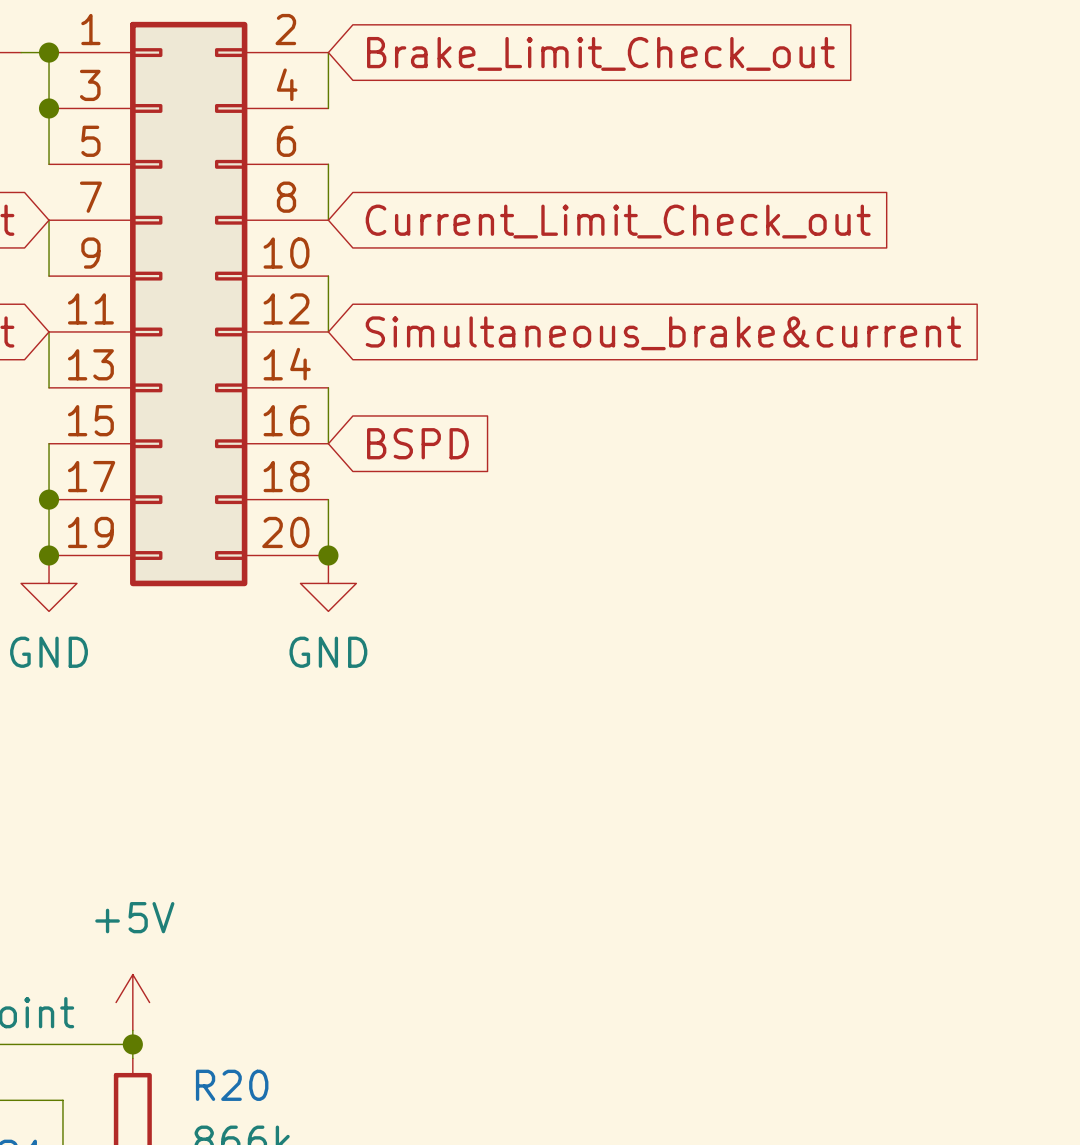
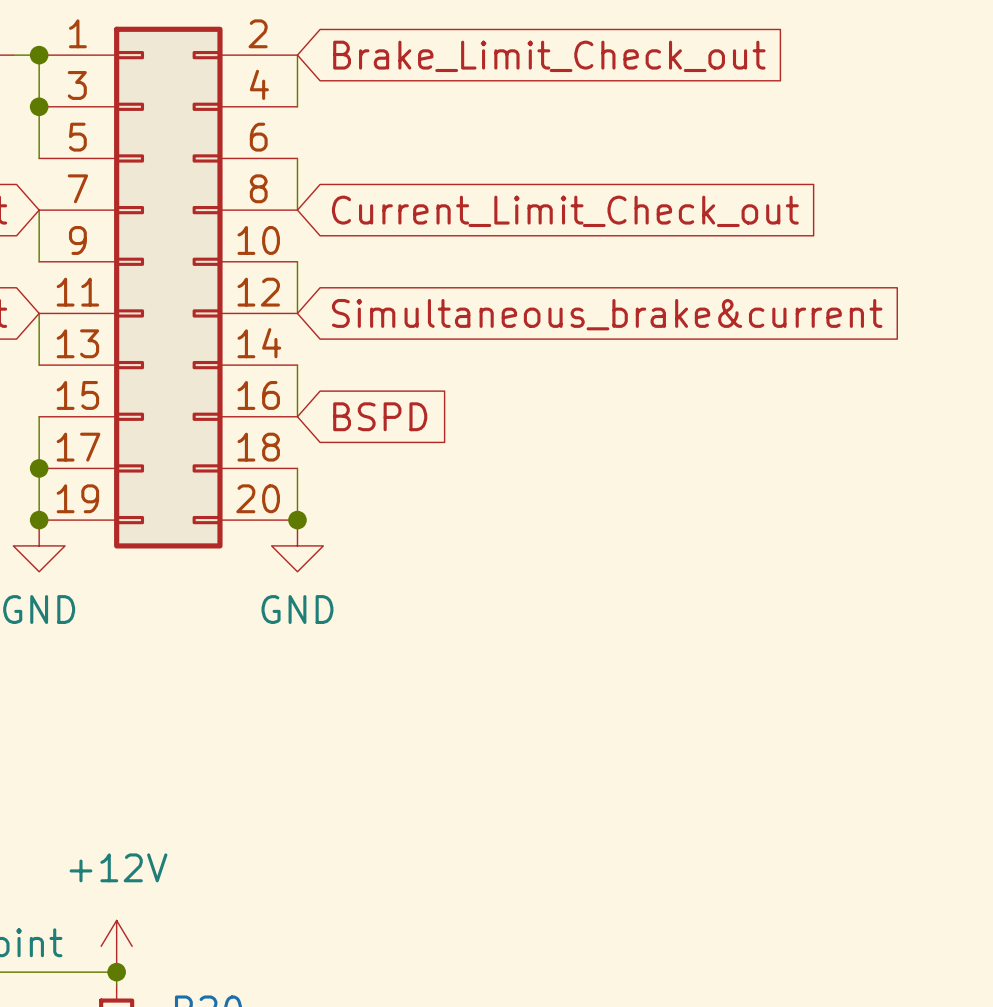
power symbol: +5V (132, 1002) -> +12V (116, 946)

